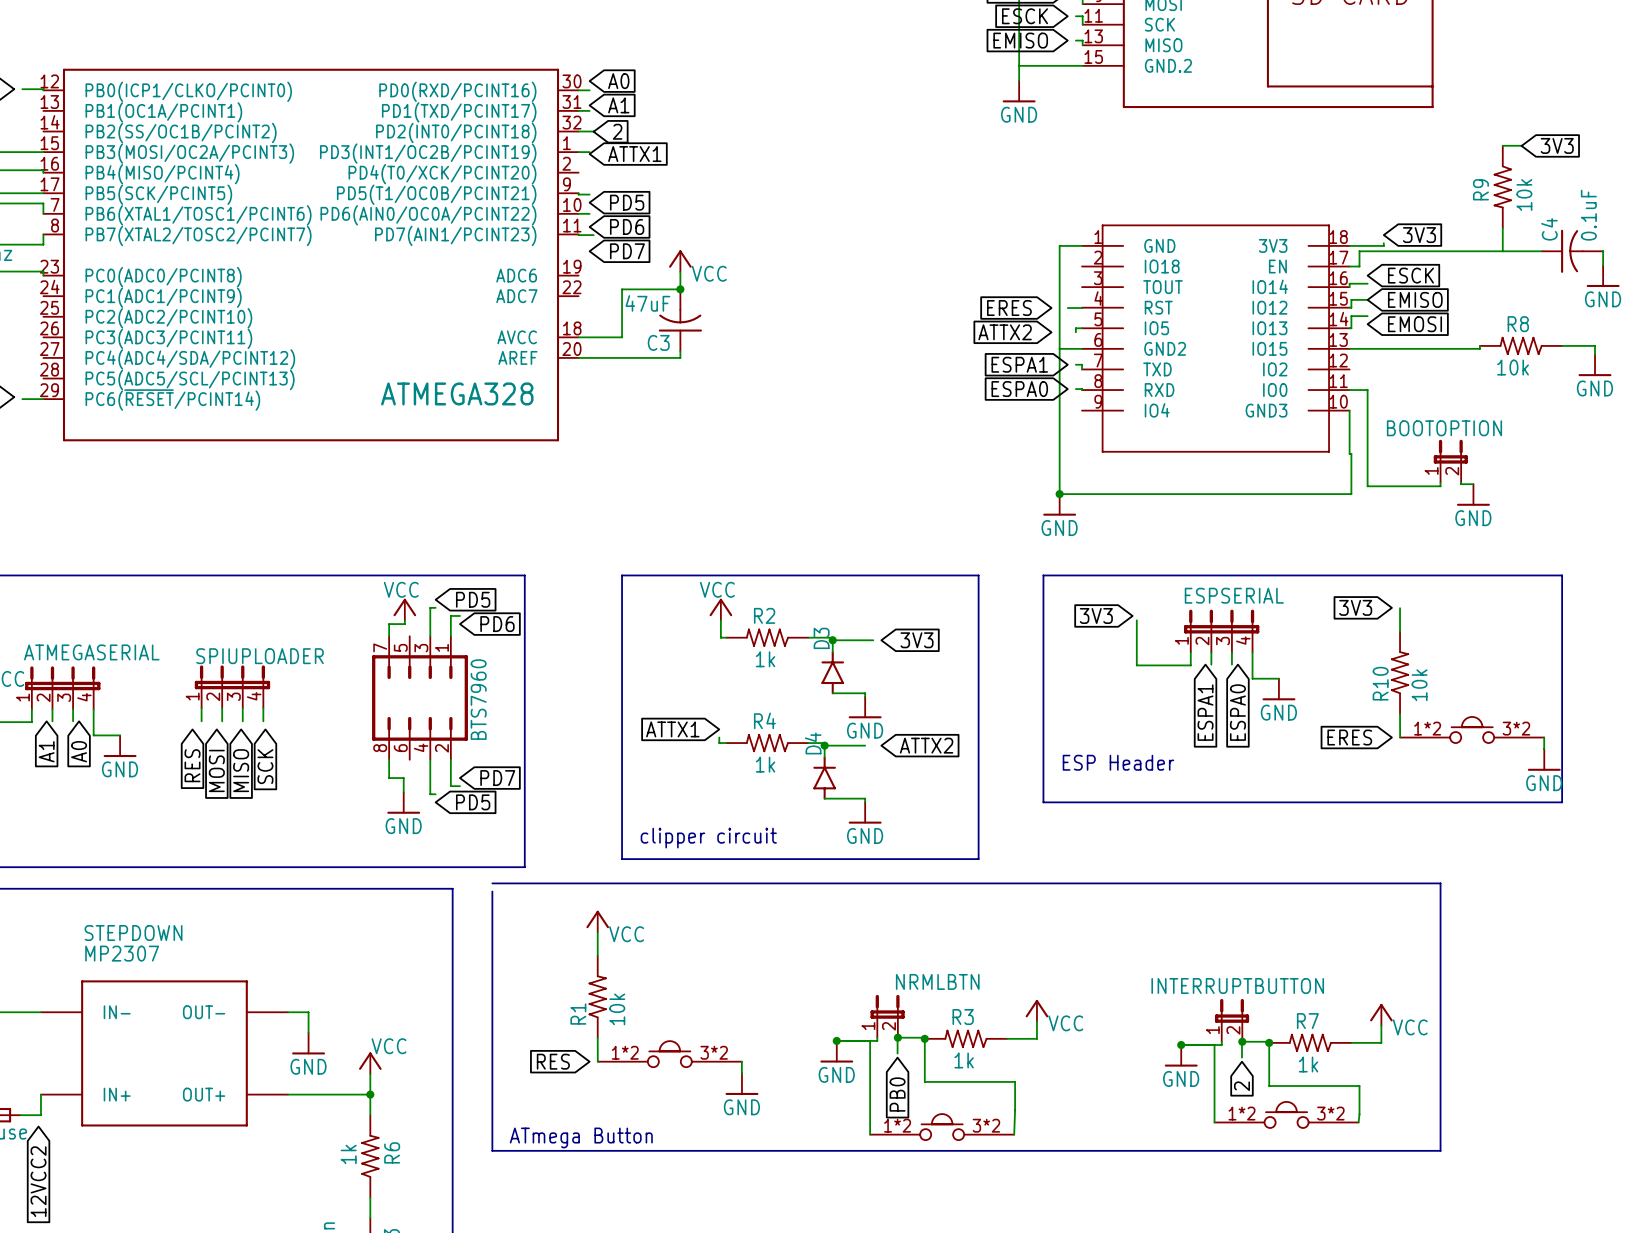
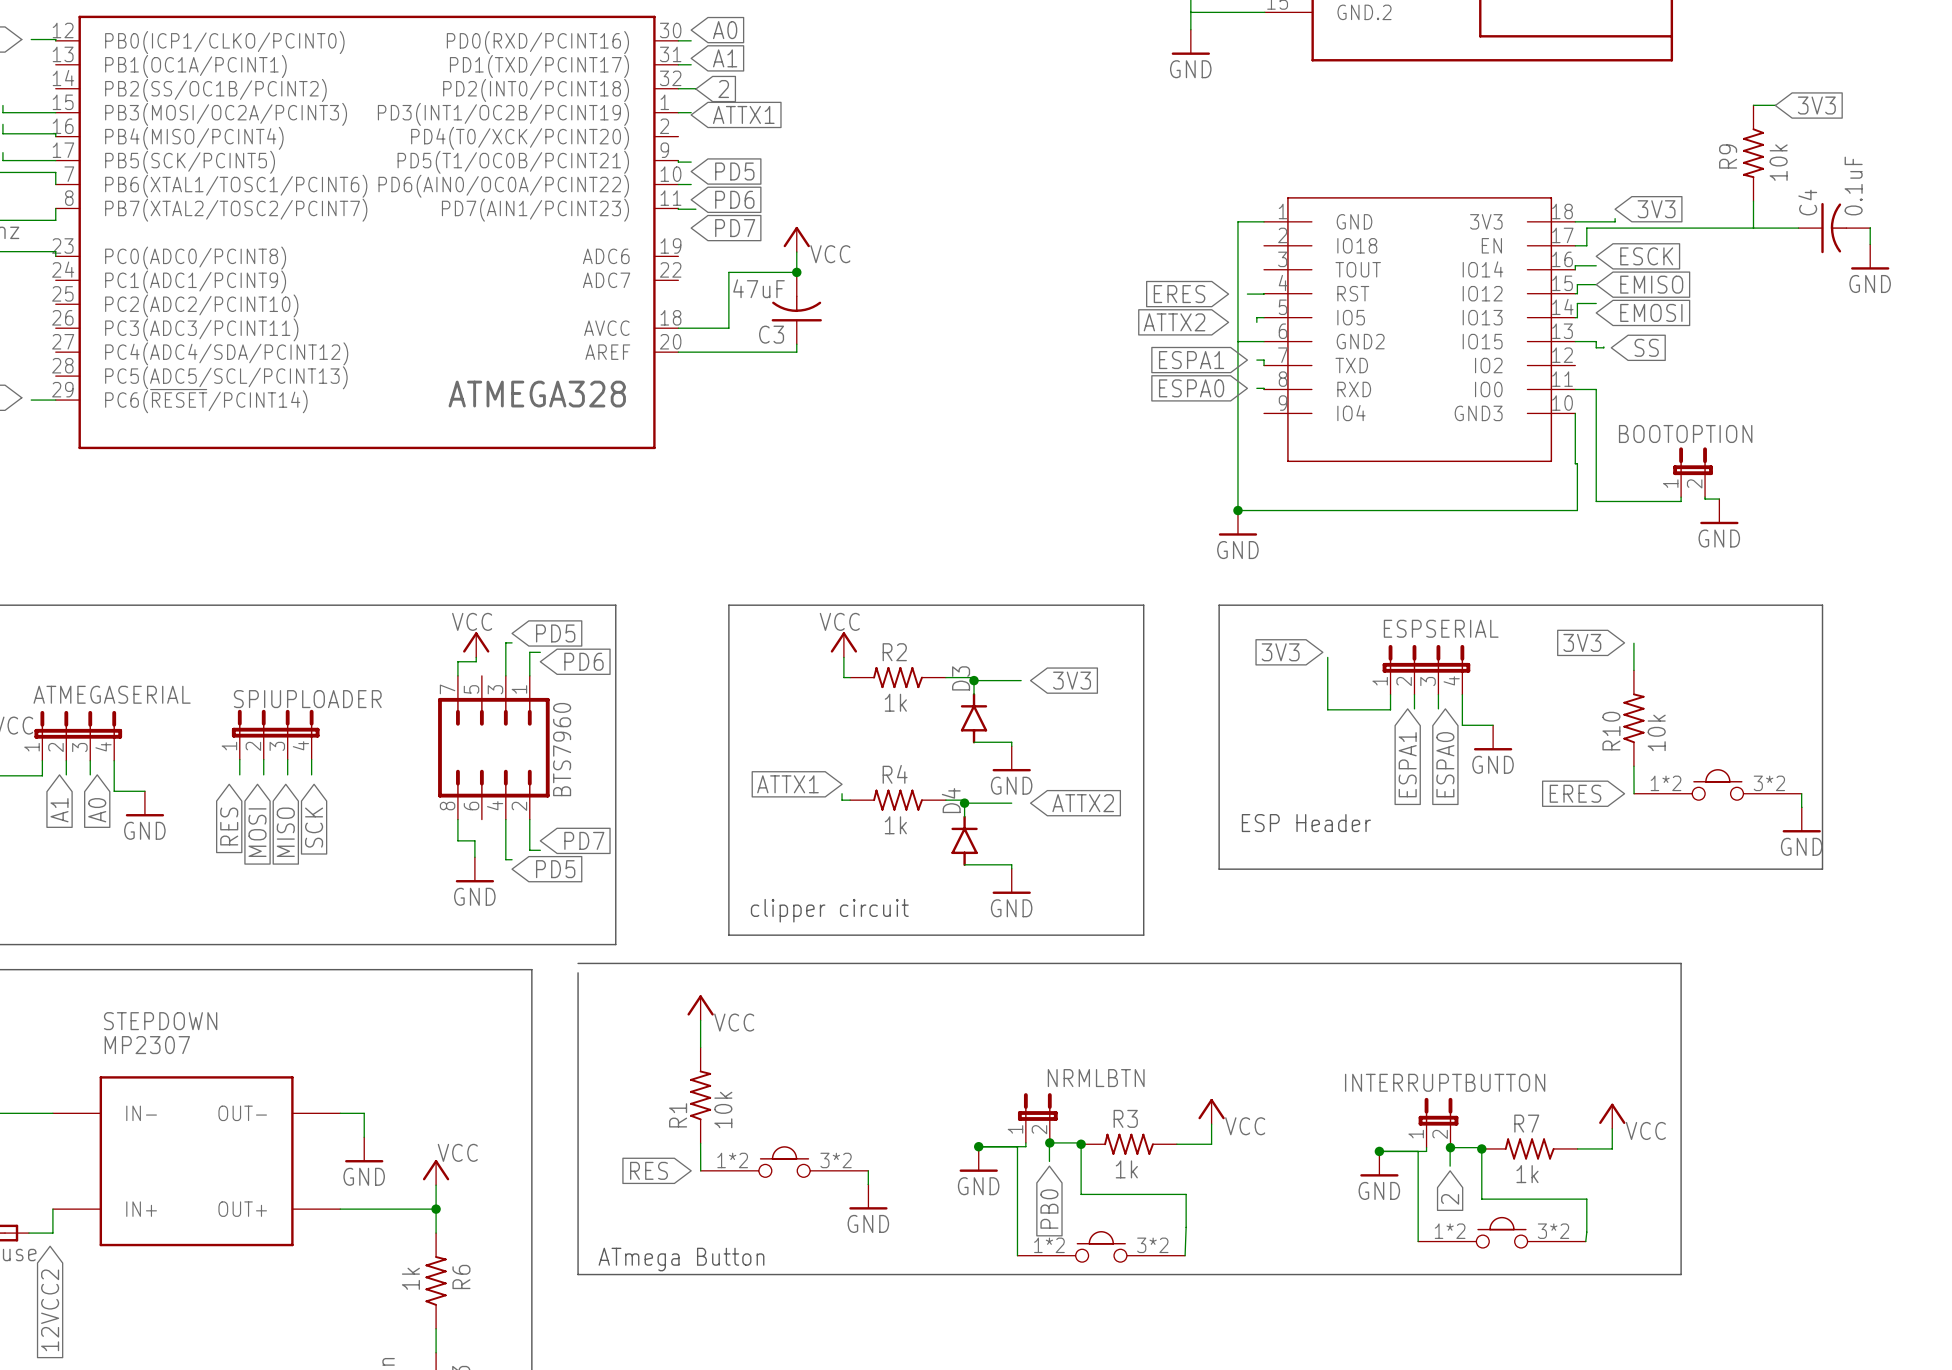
wire: (1479, 345) (1479, 348) (1367, 348) -> (1603, 346) (1596, 347) (1596, 341)
R8: 10k (1521, 345) -> none
wire: (1562, 345) (1595, 345) (1595, 354) -> none
global label: none -> SS (1646, 347)
power symbol: GND (1595, 365) -> none

